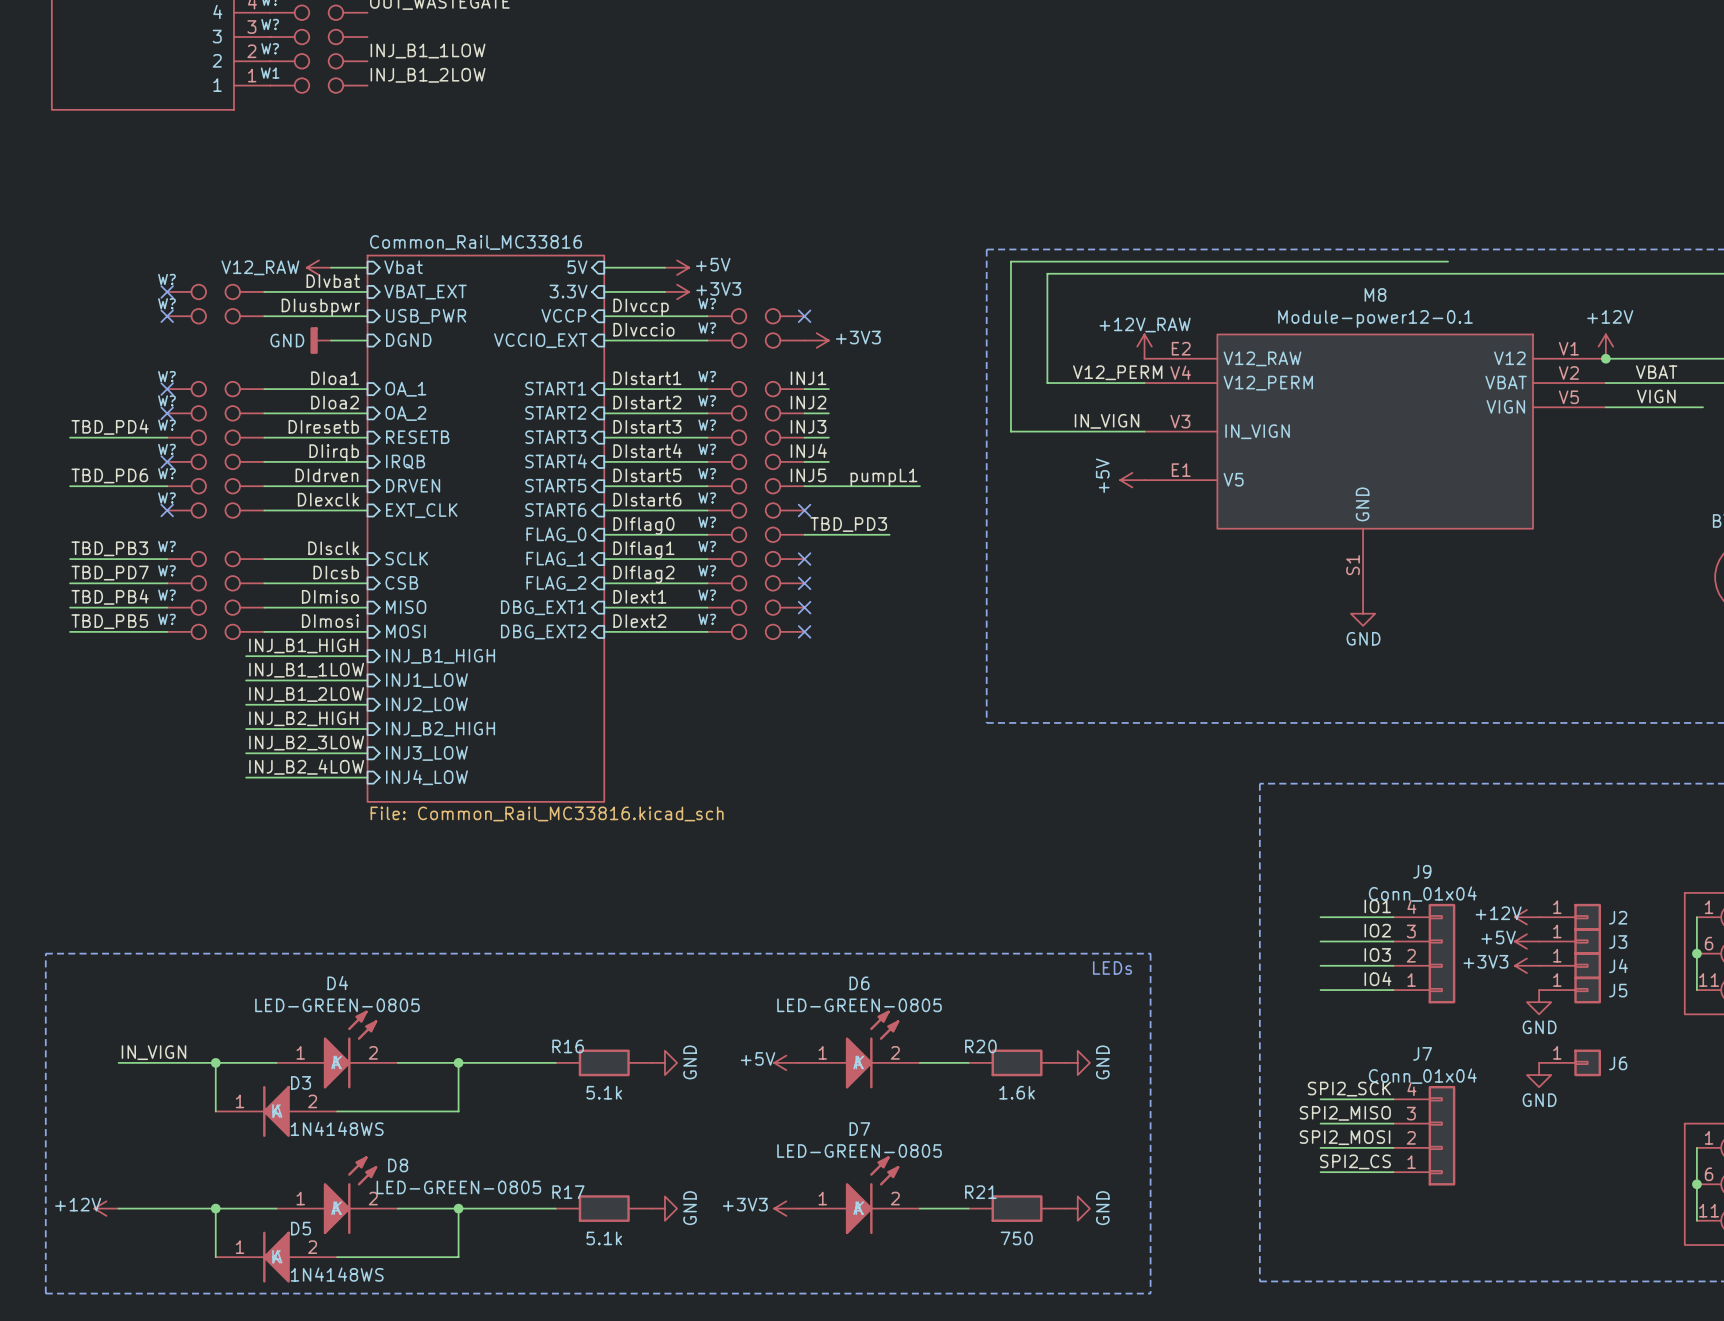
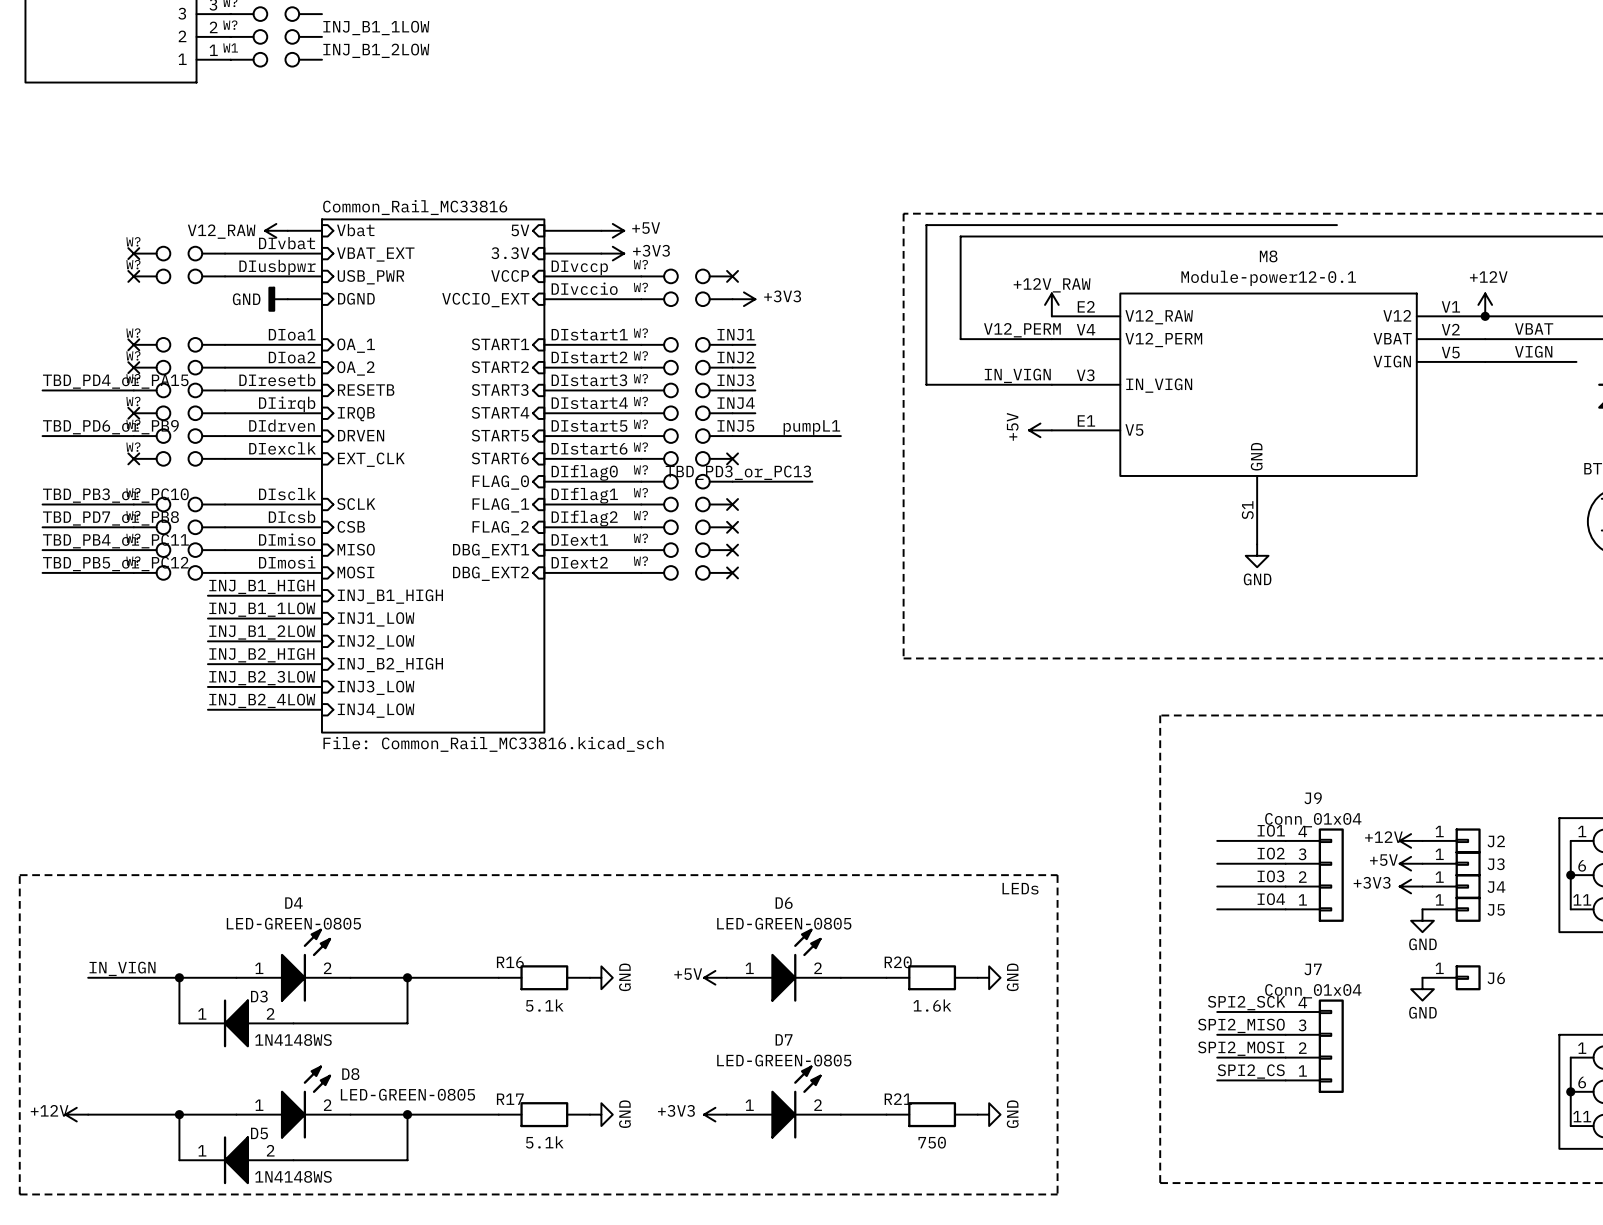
label: TBD_PD4 (110, 427) -> TBD_PD4_or_PA15 (115, 381)
label: TBD_PD6 (109, 475) -> TBD_PD6_or_PB9 (110, 427)
label: TBD_PD3 (848, 524) -> TBD_PD3_or_PC13 (738, 472)
label: TBD_PB3 (109, 548) -> TBD_PB3_or_PC10 (115, 495)
label: TBD_PD7 (110, 573) -> TBD_PD7_or_PB8 (110, 518)
label: TBD_PB4 (110, 597) -> TBD_PB4_or_PC11 (115, 541)
label: TBD_PB5 (109, 621) -> TBD_PB5_or_PC12 (115, 564)

